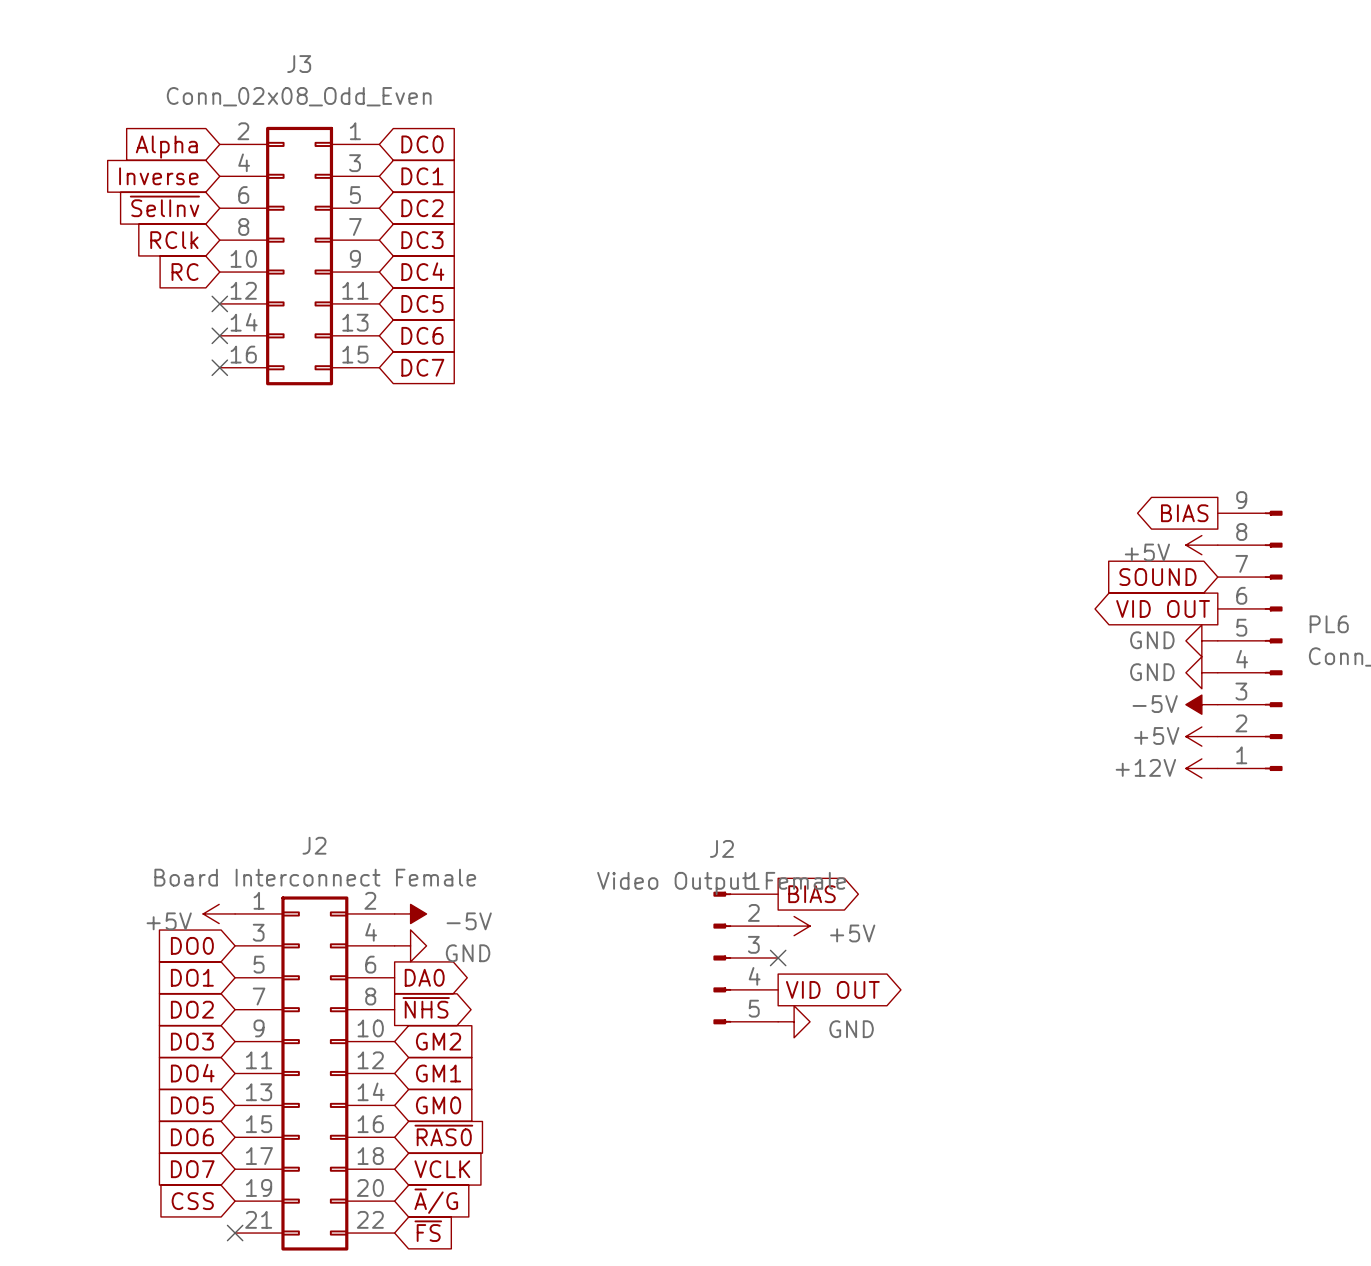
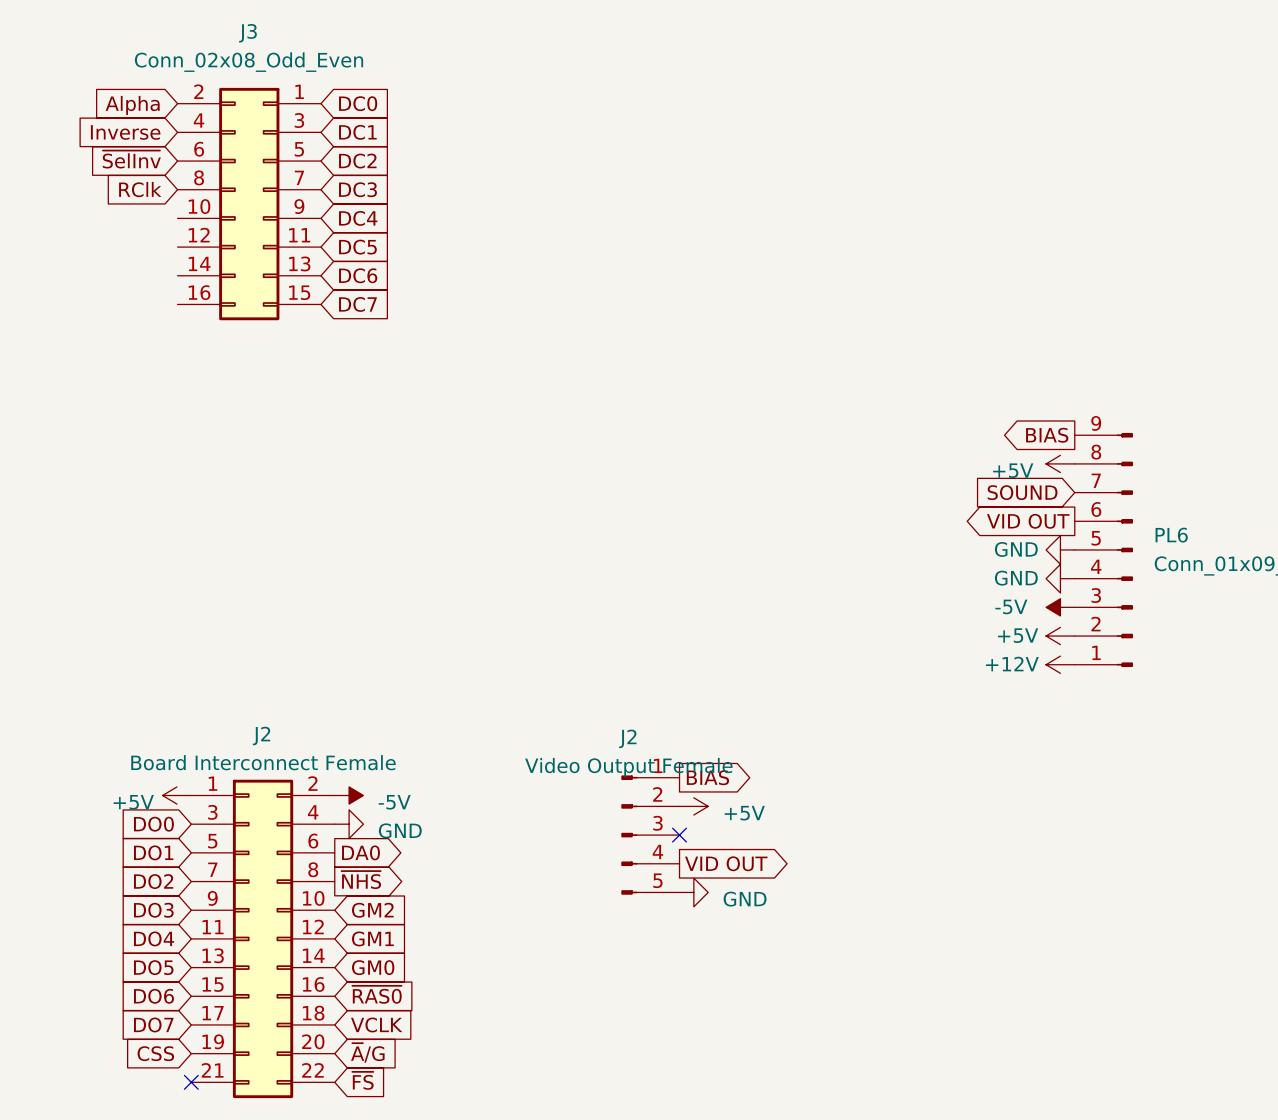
global label: RC (185, 272) -> none
no-connect mark: (219, 303) -> none
no-connect mark: (219, 335) -> none
no-connect mark: (219, 367) -> none

